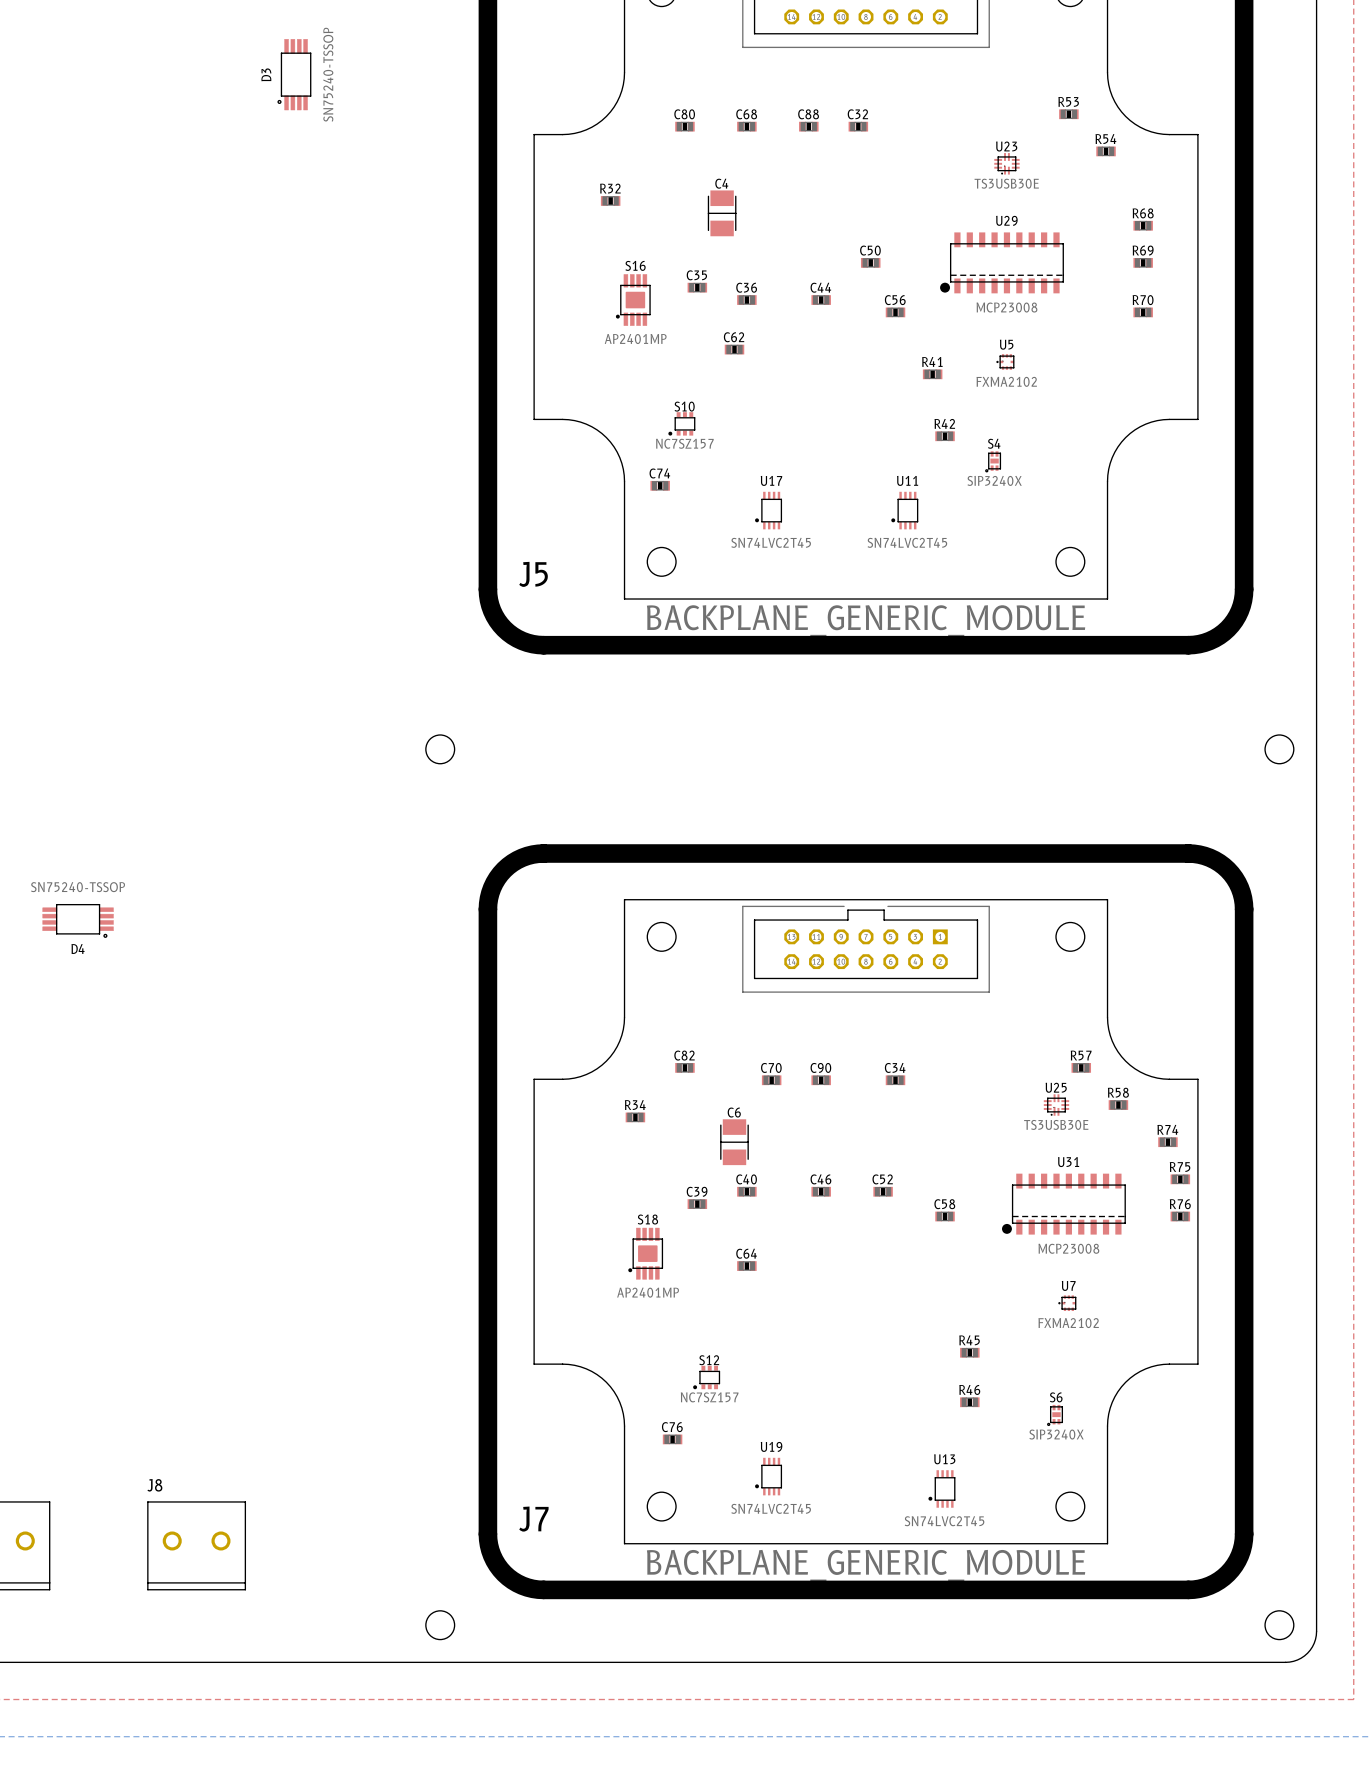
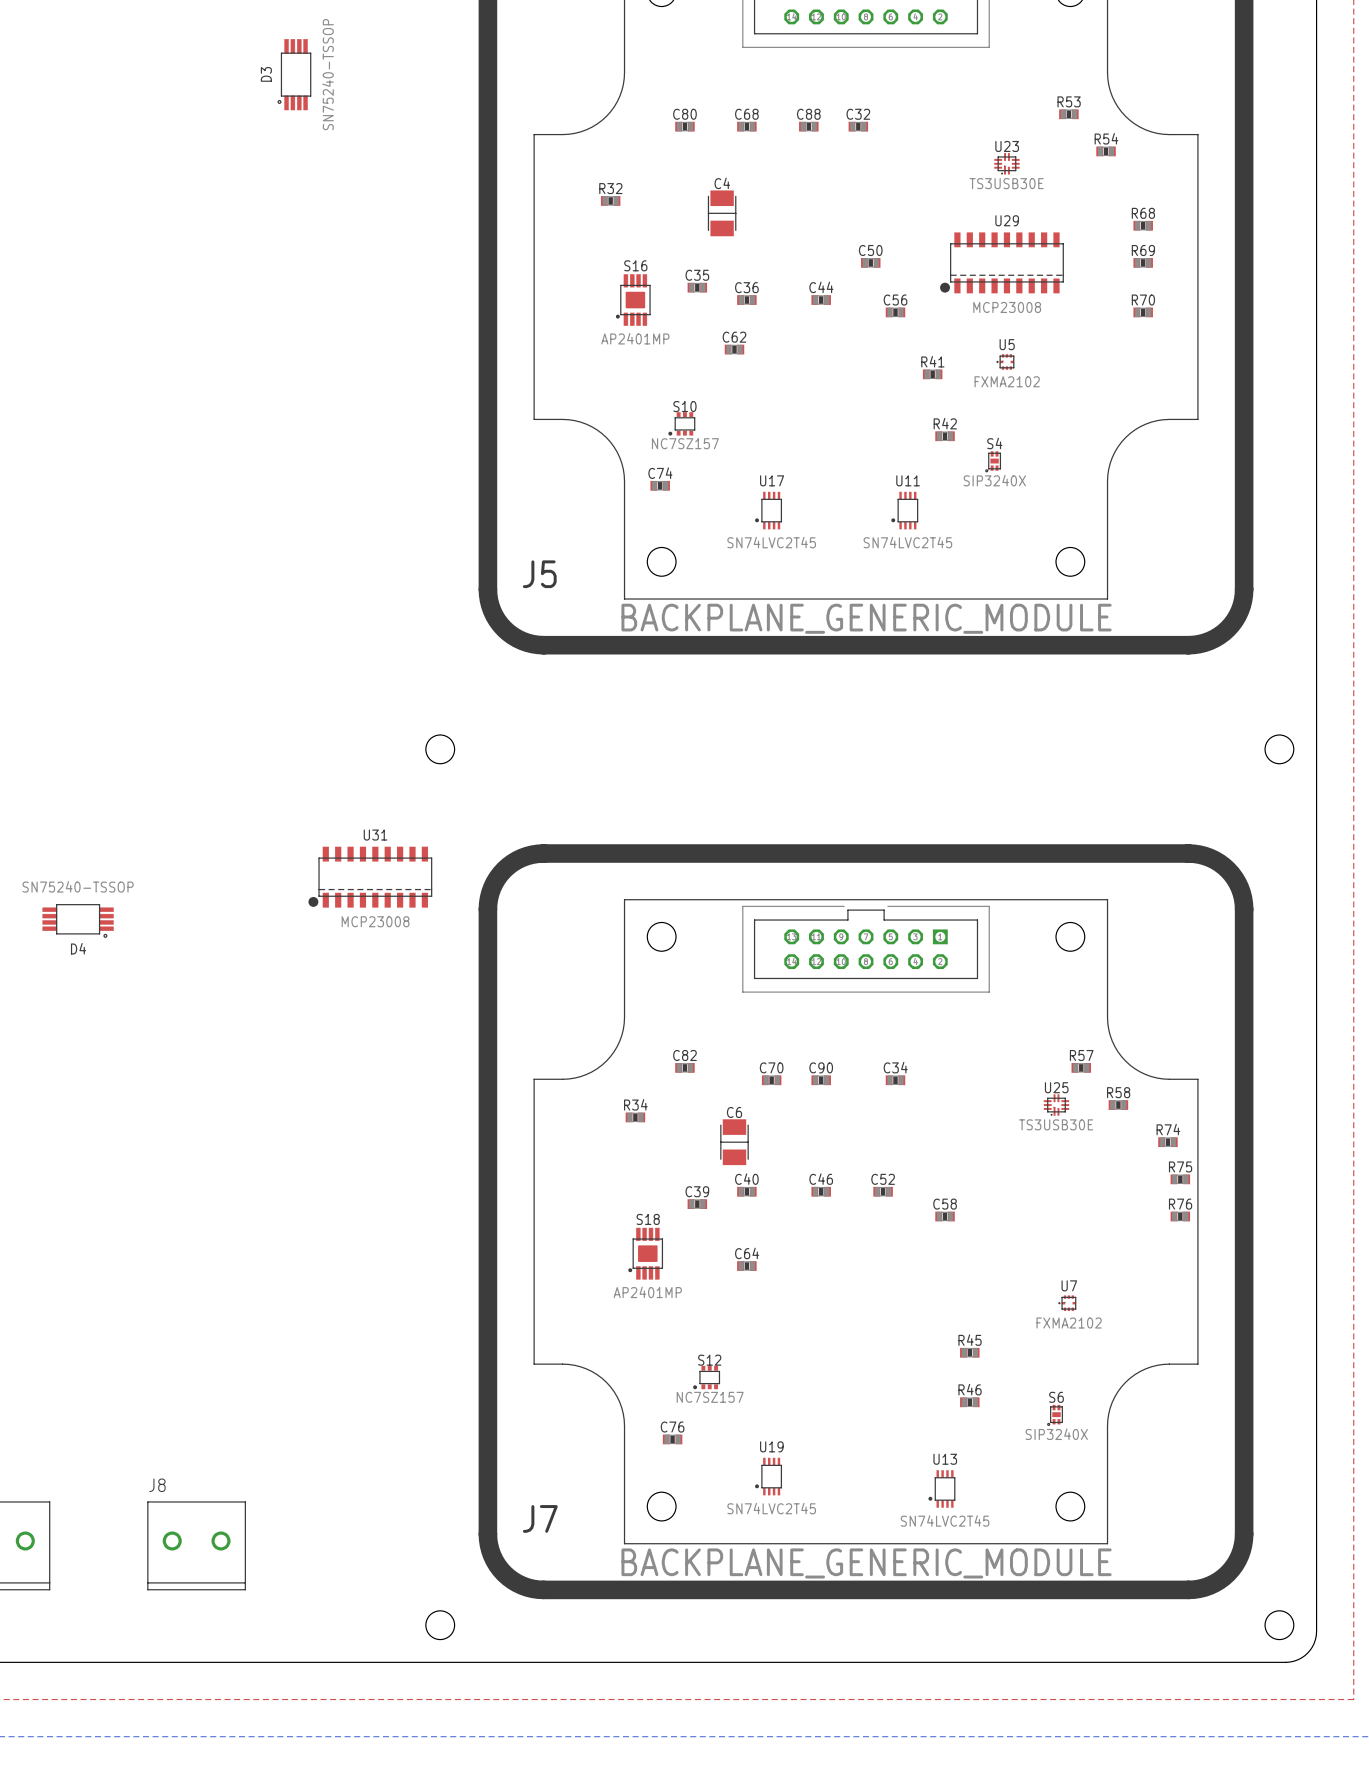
U31 position: (1063, 1204) -> (370, 877)

